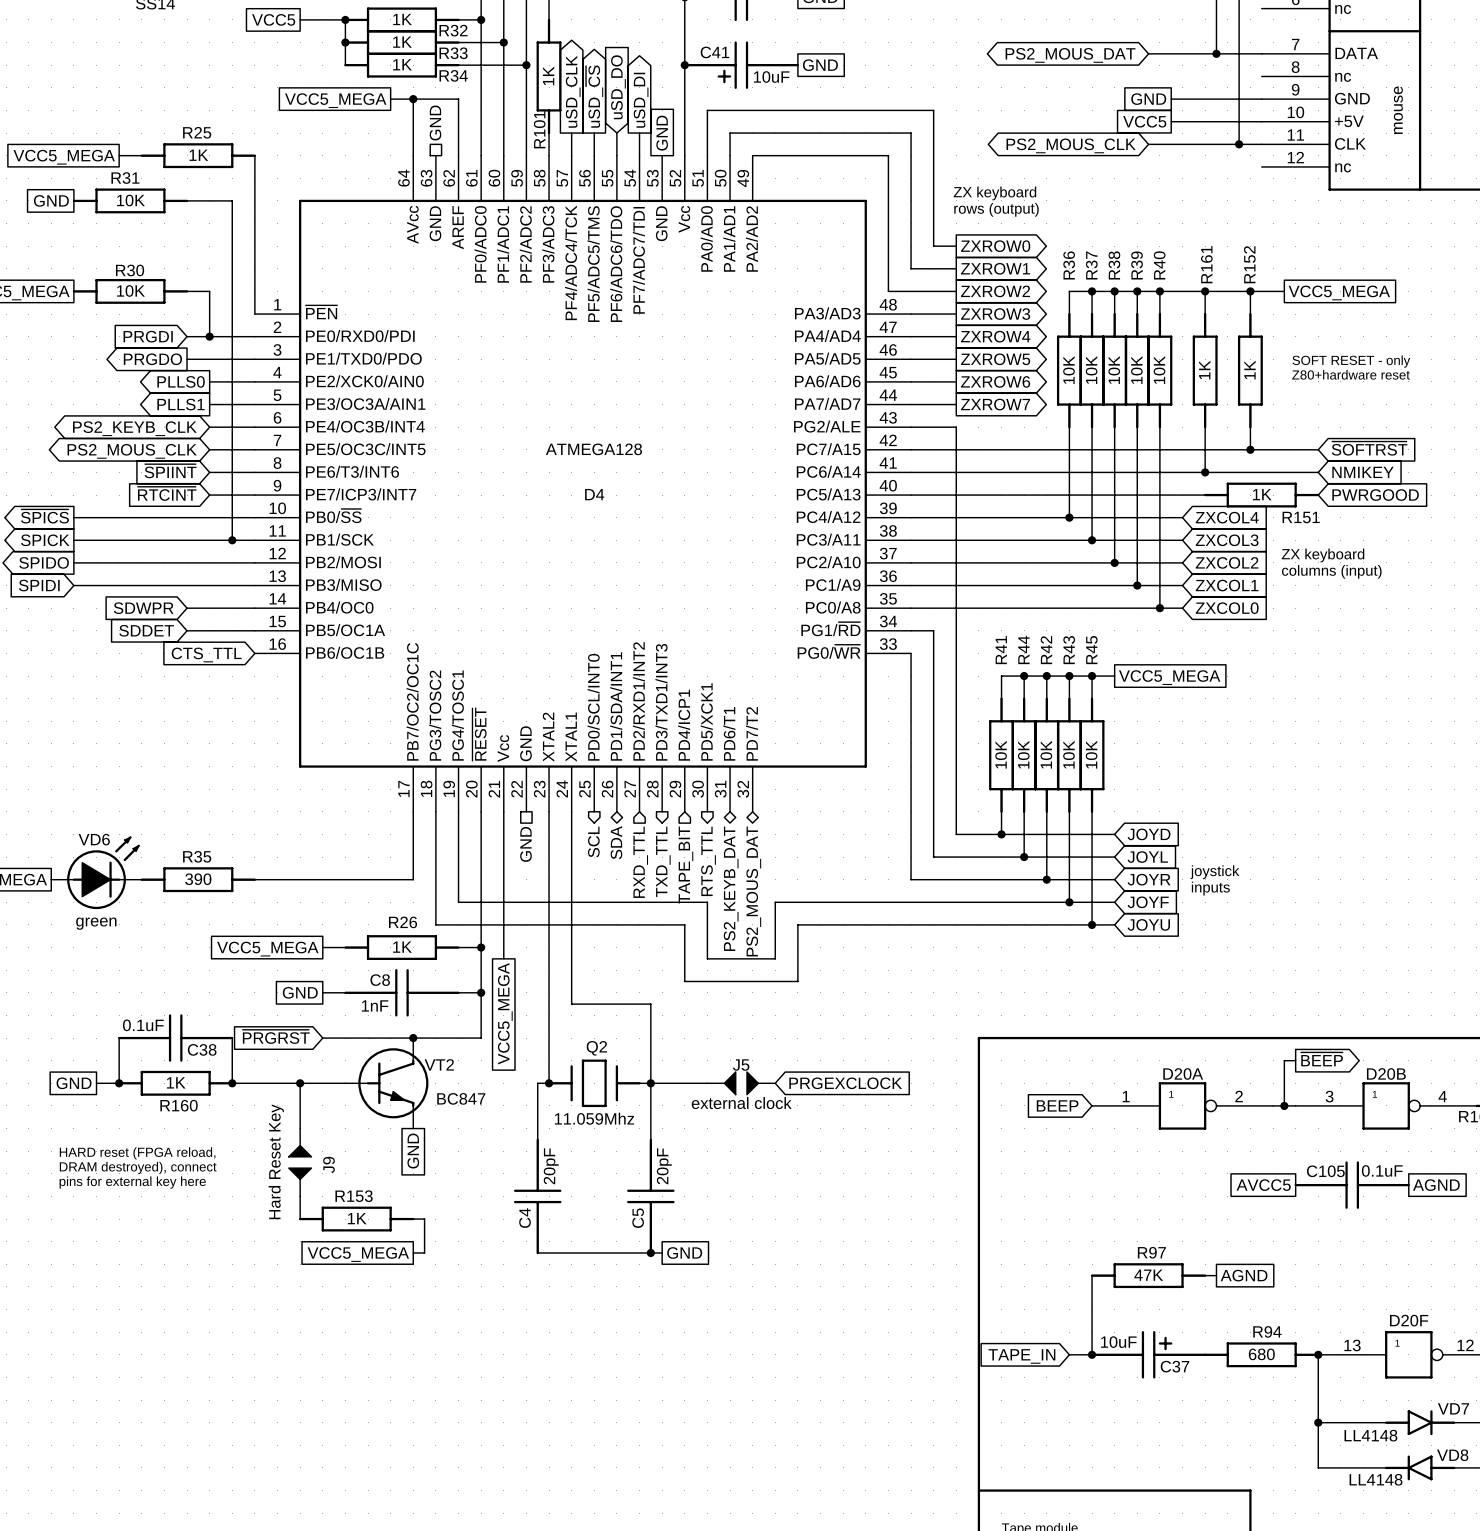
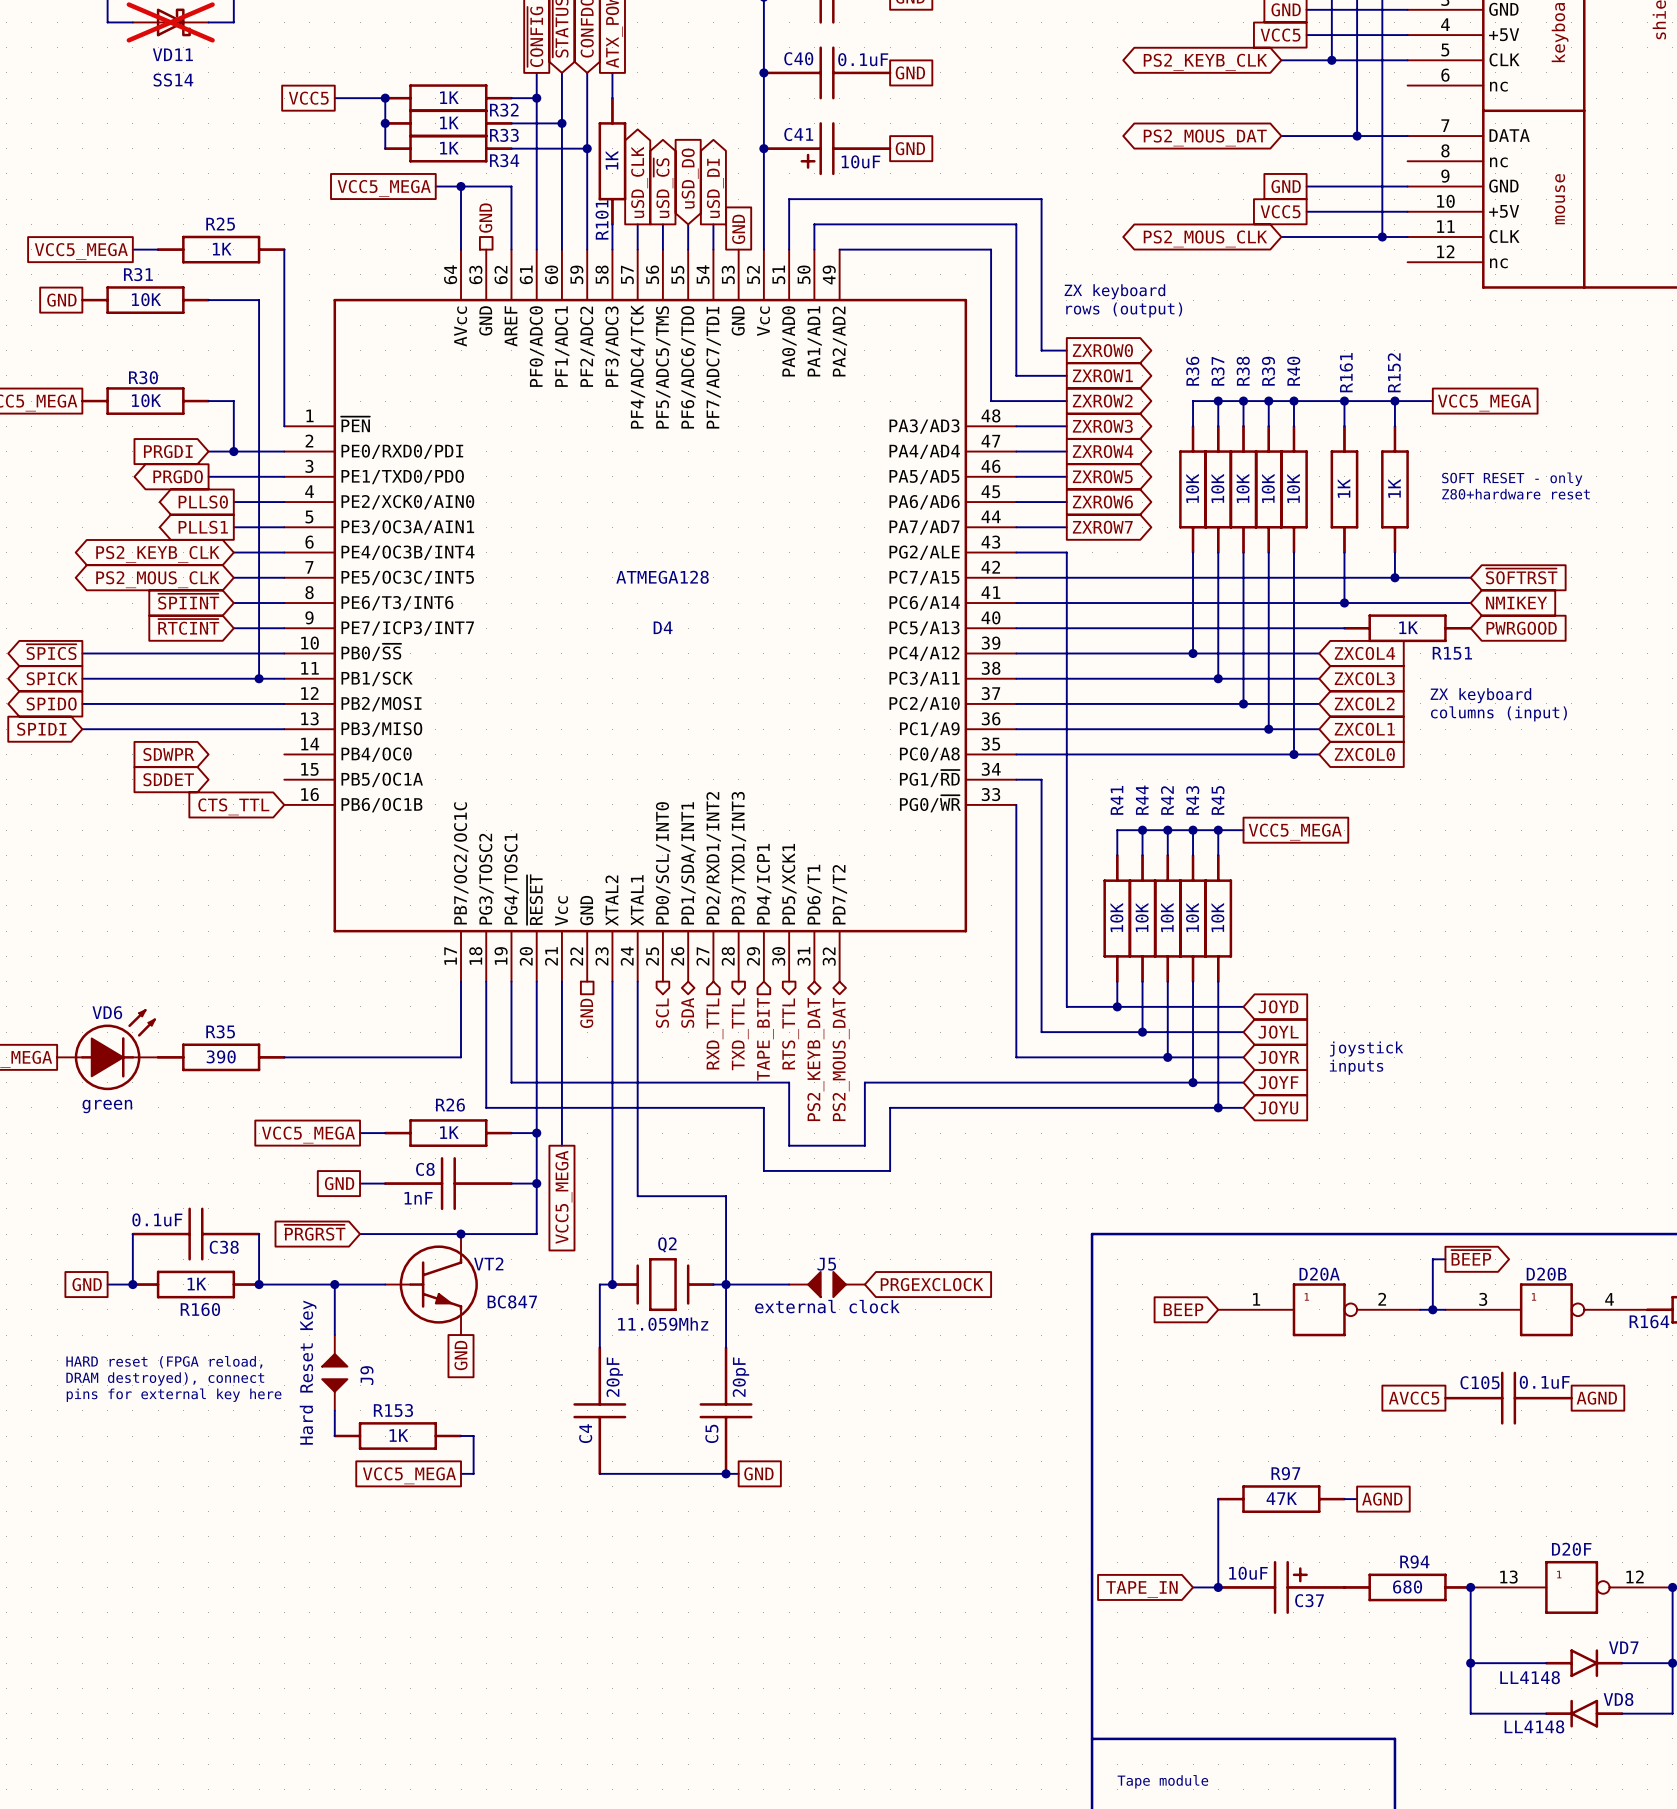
wire: (187, 608) (254, 608) -> none
wire: (187, 630) (254, 630) -> none

